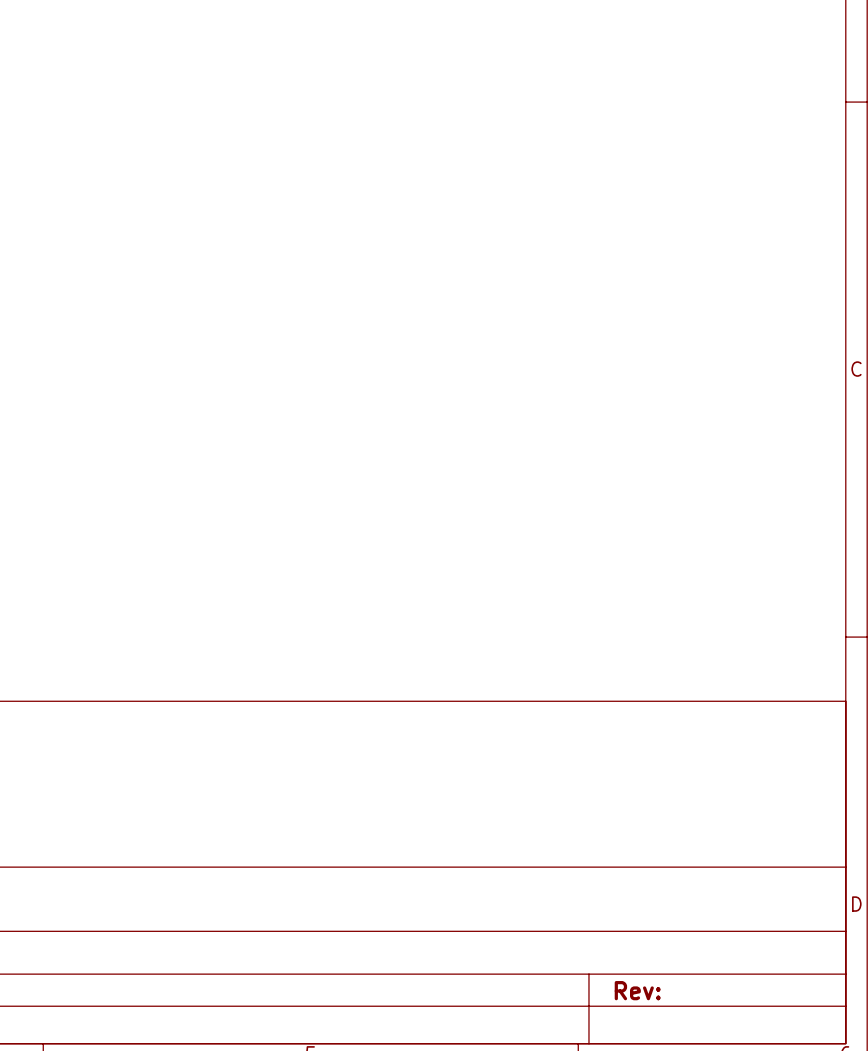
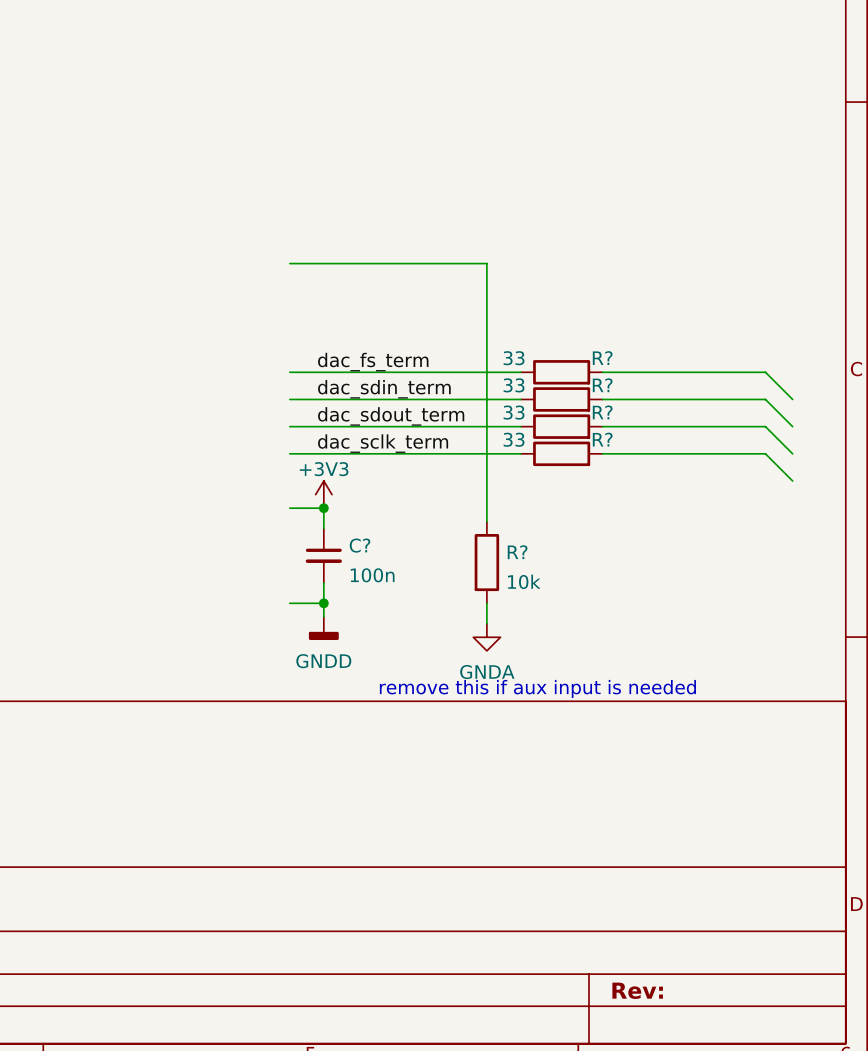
wire: none -> (289, 263) (486, 263) (486, 521)
label: none -> dac_fs_term (373, 362)
wire: none -> (289, 372) (520, 372)
R?: none -> 33 (561, 372)
wire: none -> (602, 372) (765, 372) (792, 399)
label: none -> dac_sdin_term (384, 389)
wire: none -> (289, 399) (520, 399)
R?: none -> 33 (561, 399)
wire: none -> (602, 399) (765, 399) (792, 426)
label: none -> dac_sdout_term (391, 416)
wire: none -> (289, 426) (520, 426)
R?: none -> 33 (561, 426)
wire: none -> (602, 426) (765, 426) (792, 453)
label: none -> dac_sclk_term (383, 443)
wire: none -> (289, 453) (520, 453)
R?: none -> 33 (561, 453)
wire: none -> (602, 453) (765, 453) (792, 481)
power symbol: none -> +3V3 (323, 494)
wire: none -> (289, 508) (323, 508) (323, 528)
junction: none -> (323, 508)
C?: none -> 100n (323, 555)
R?: none -> 10k (486, 562)
wire: none -> (323, 582) (323, 616)
wire: none -> (289, 603) (323, 603)
junction: none -> (323, 603)
wire: none -> (486, 603) (486, 623)
power symbol: none -> GNDD (323, 628)
power symbol: none -> GNDA (486, 637)
text: none -> remove this if aux input is needed (537, 688)

